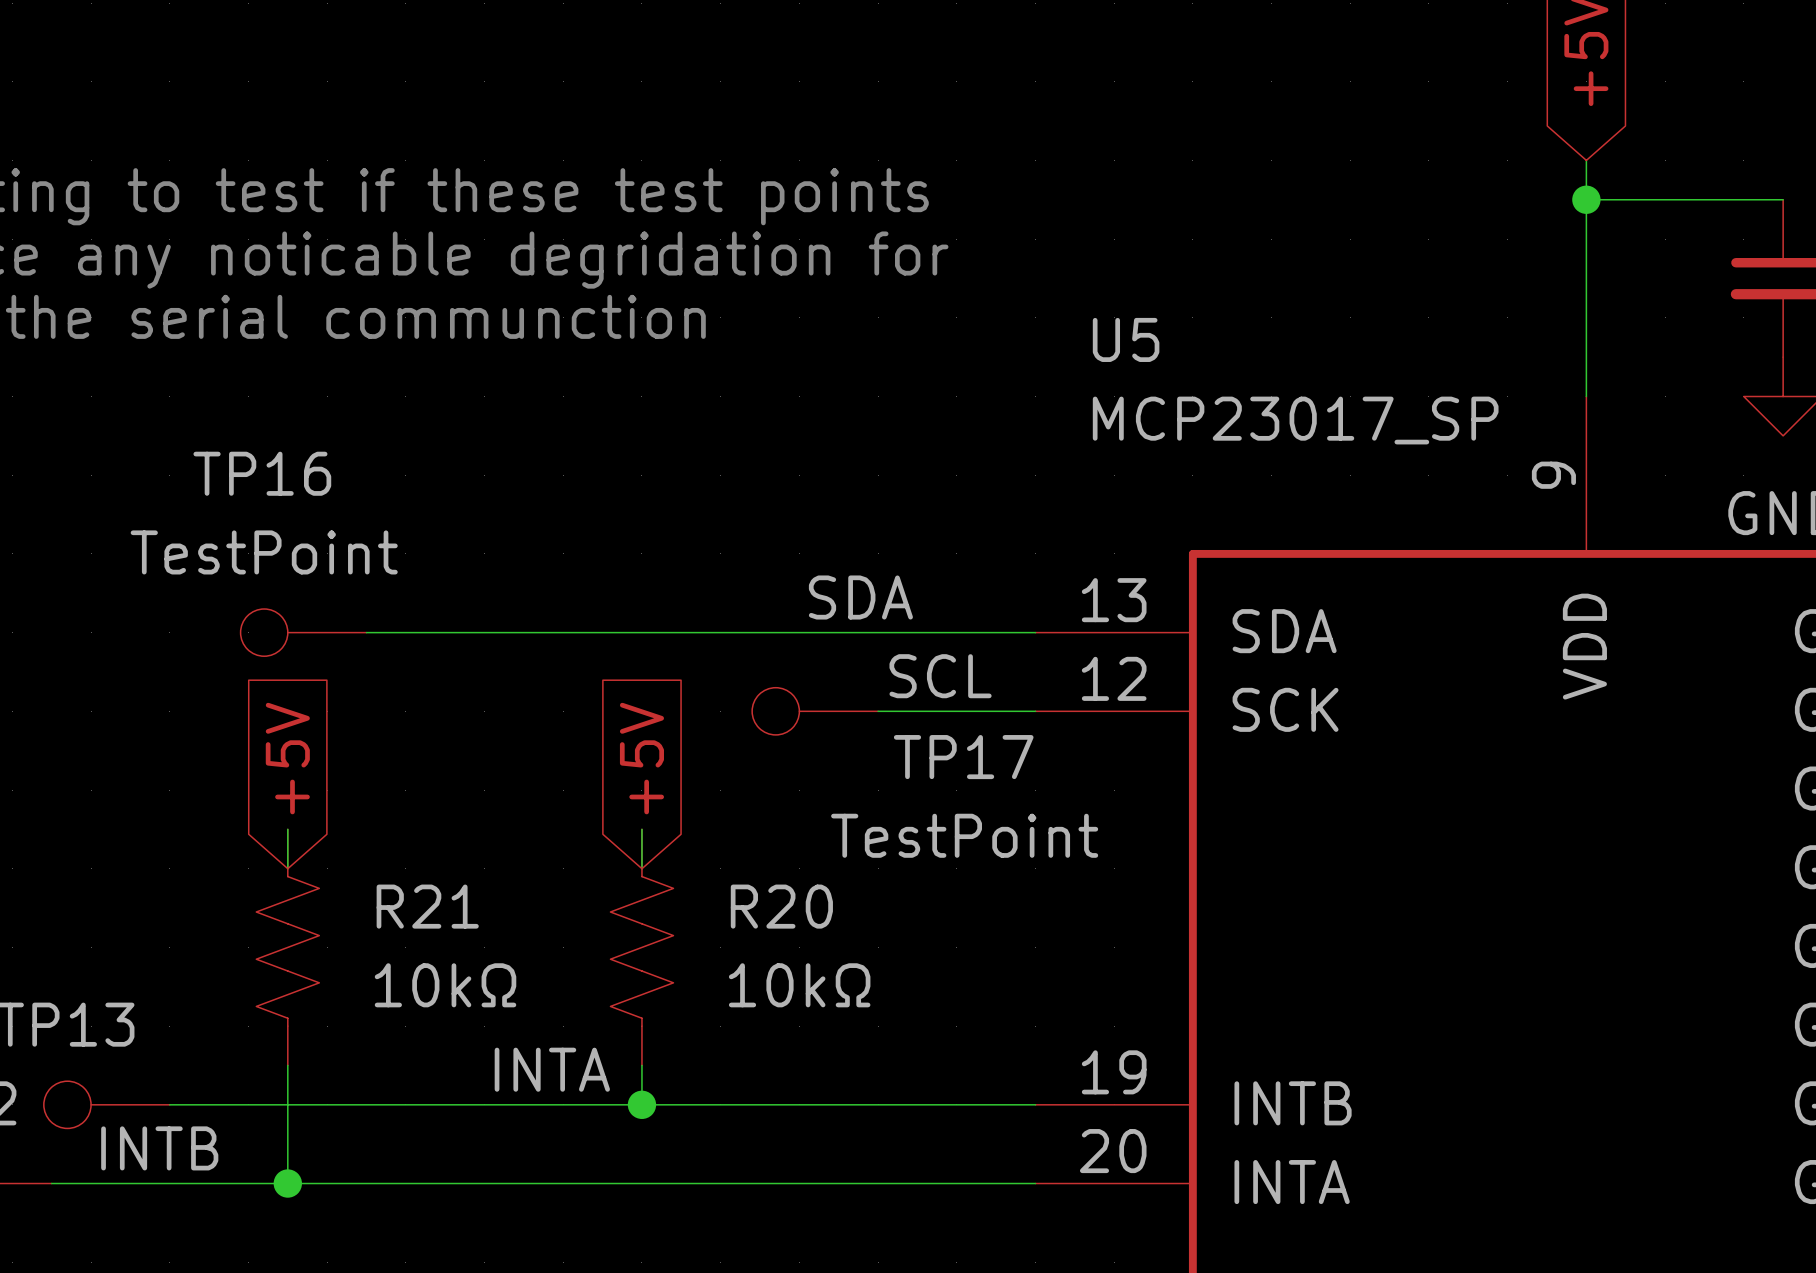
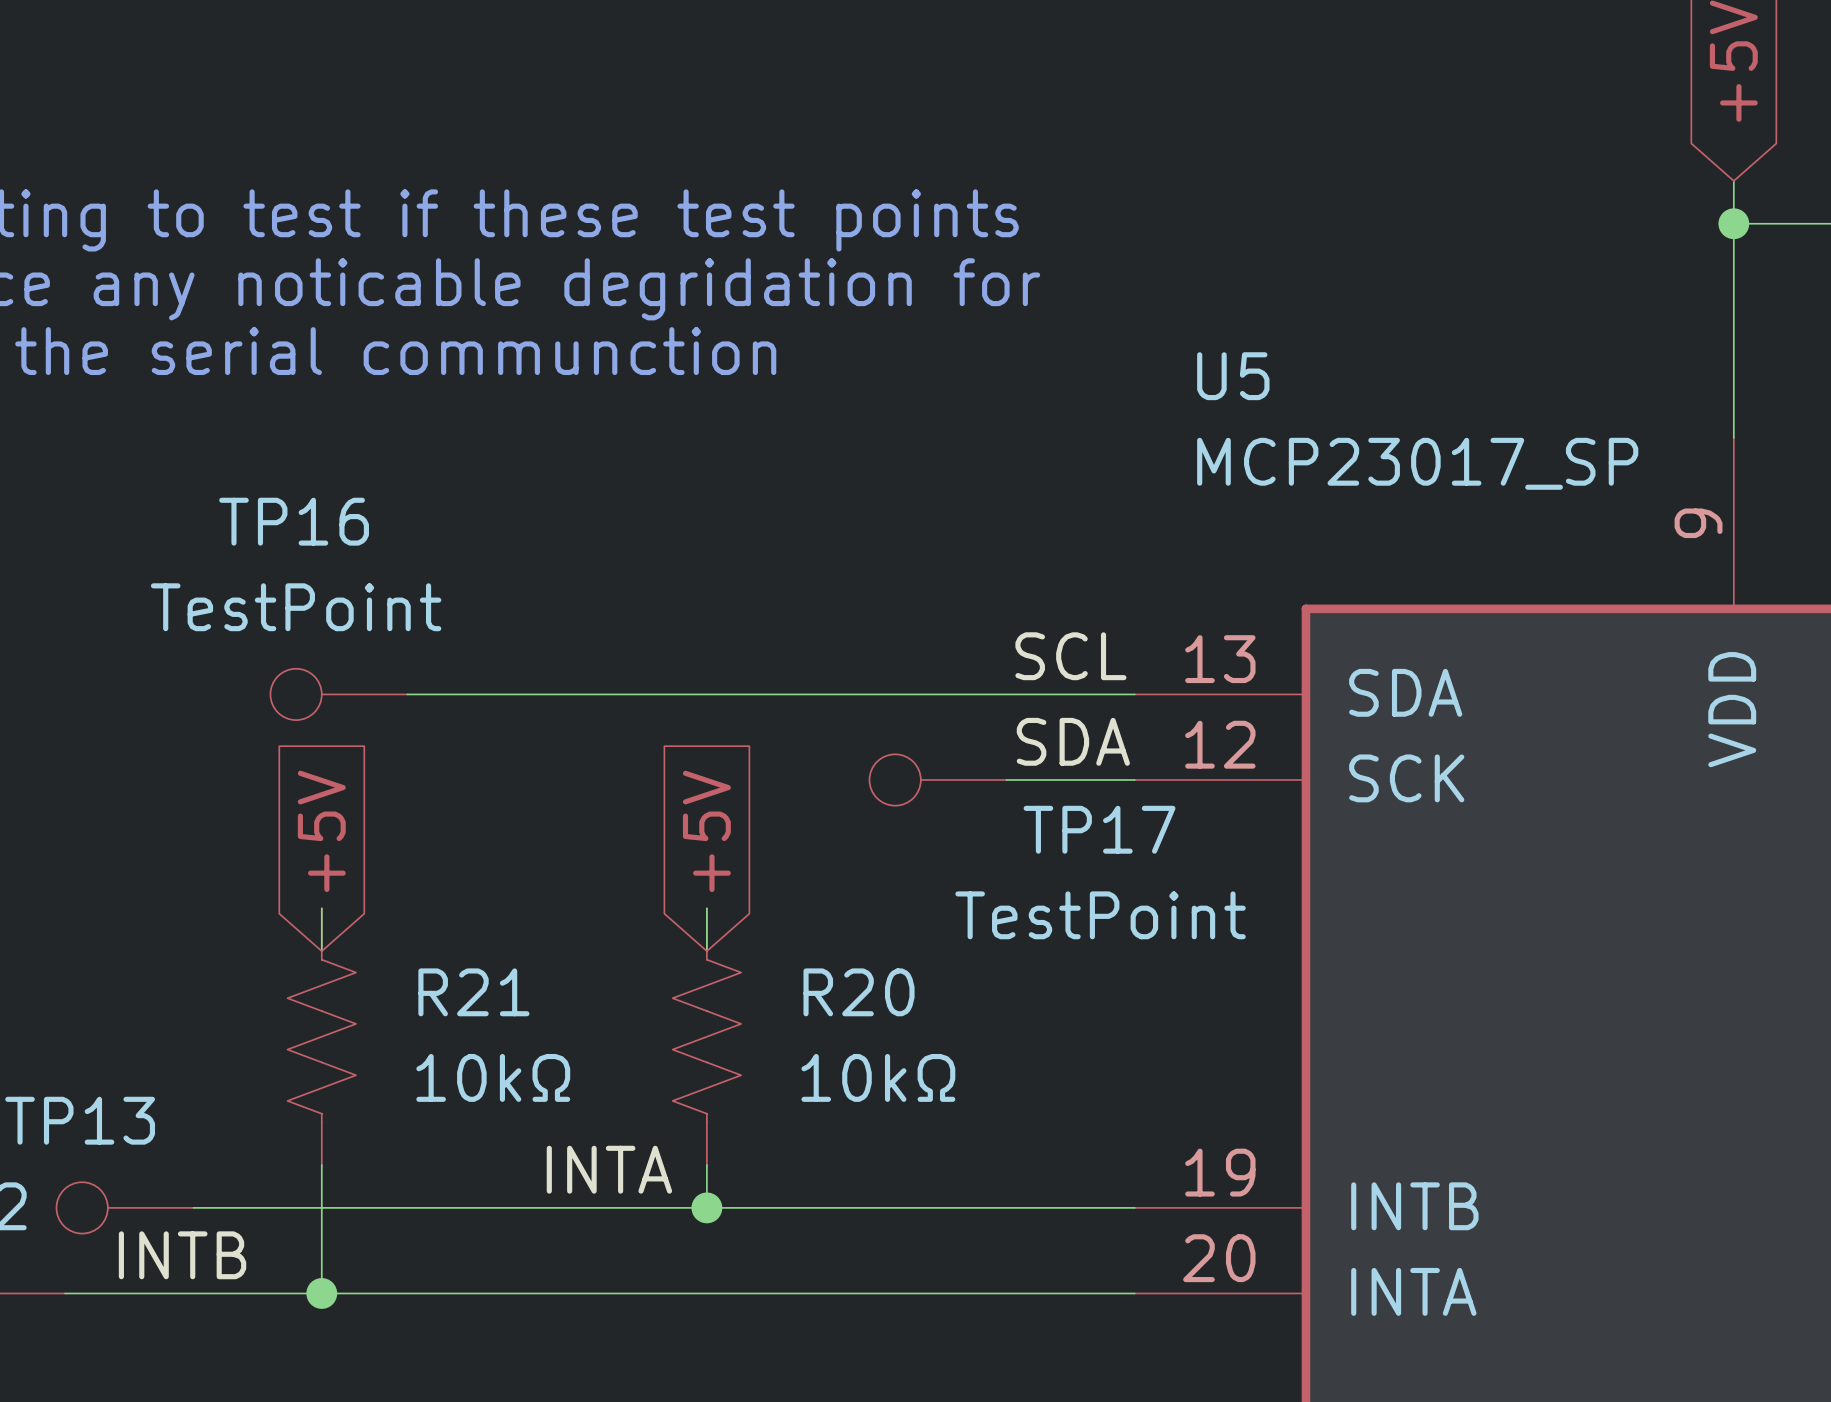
label: SDA (860, 597) -> SCL (1070, 656)
label: SCL (940, 676) -> none
label: none -> SDA (1073, 741)
TP17 position: (815, 711) -> (937, 780)

